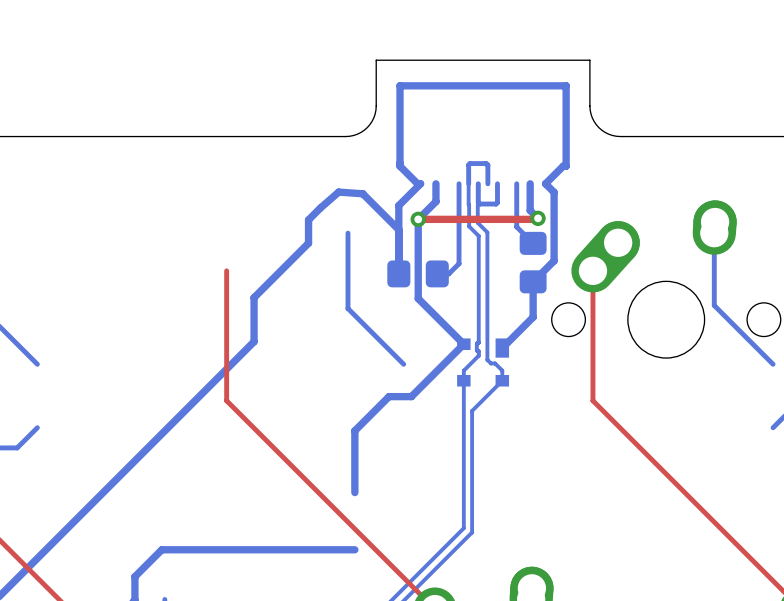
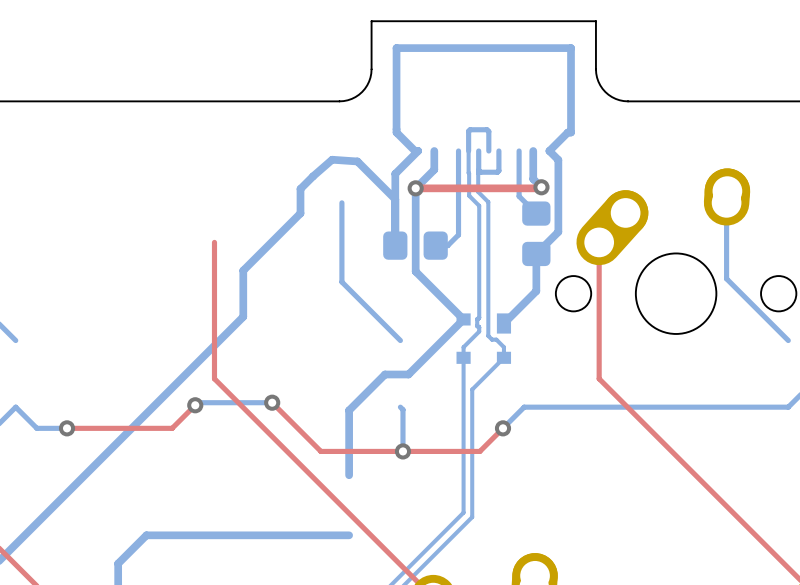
bottom track: none -> (272, 402) (197, 402) (195, 405)
top track: none -> (272, 402) (320, 451) (479, 451) (503, 428)
via: none -> (272, 402)
top track: none -> (195, 405) (172, 428) (67, 428)
via: none -> (195, 405)
bottom track: none -> (15, 407) (36, 428) (67, 428)
bottom track: none -> (400, 407) (402, 409) (402, 451)
bottom track: none -> (788, 407) (524, 407) (503, 428)
via: none -> (67, 428)
via: none -> (503, 428)
via: none -> (402, 451)

